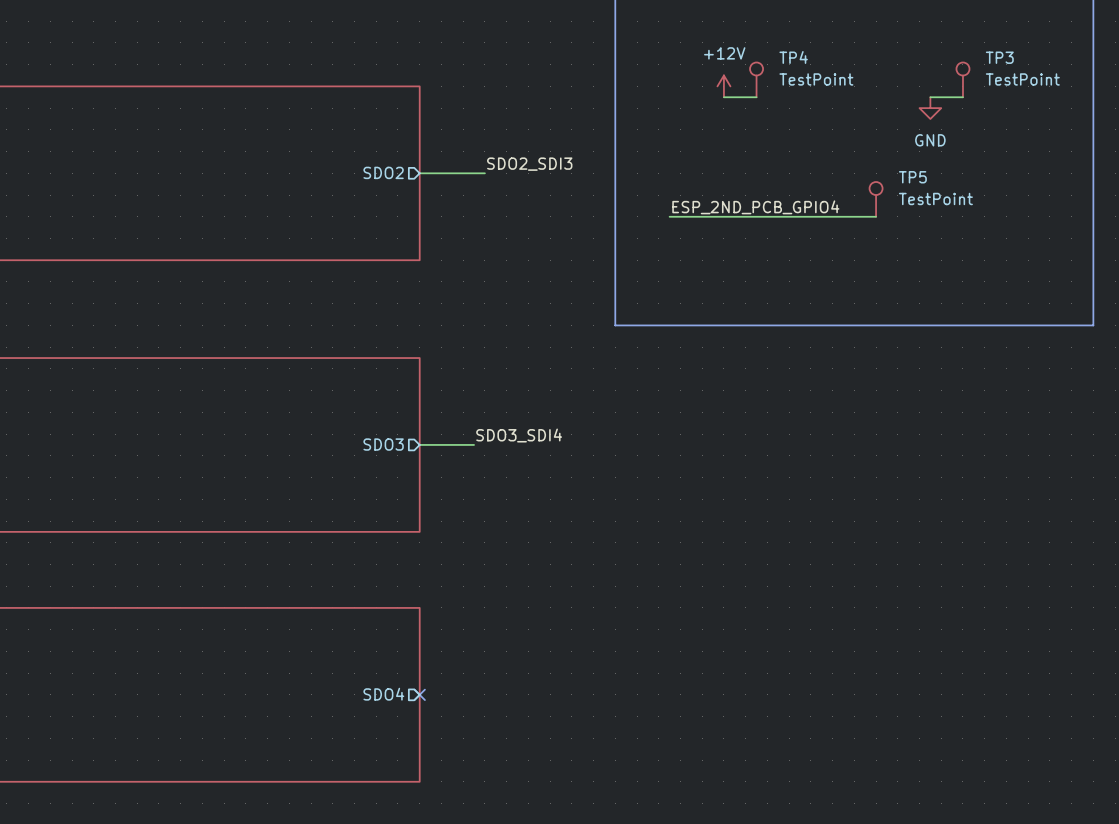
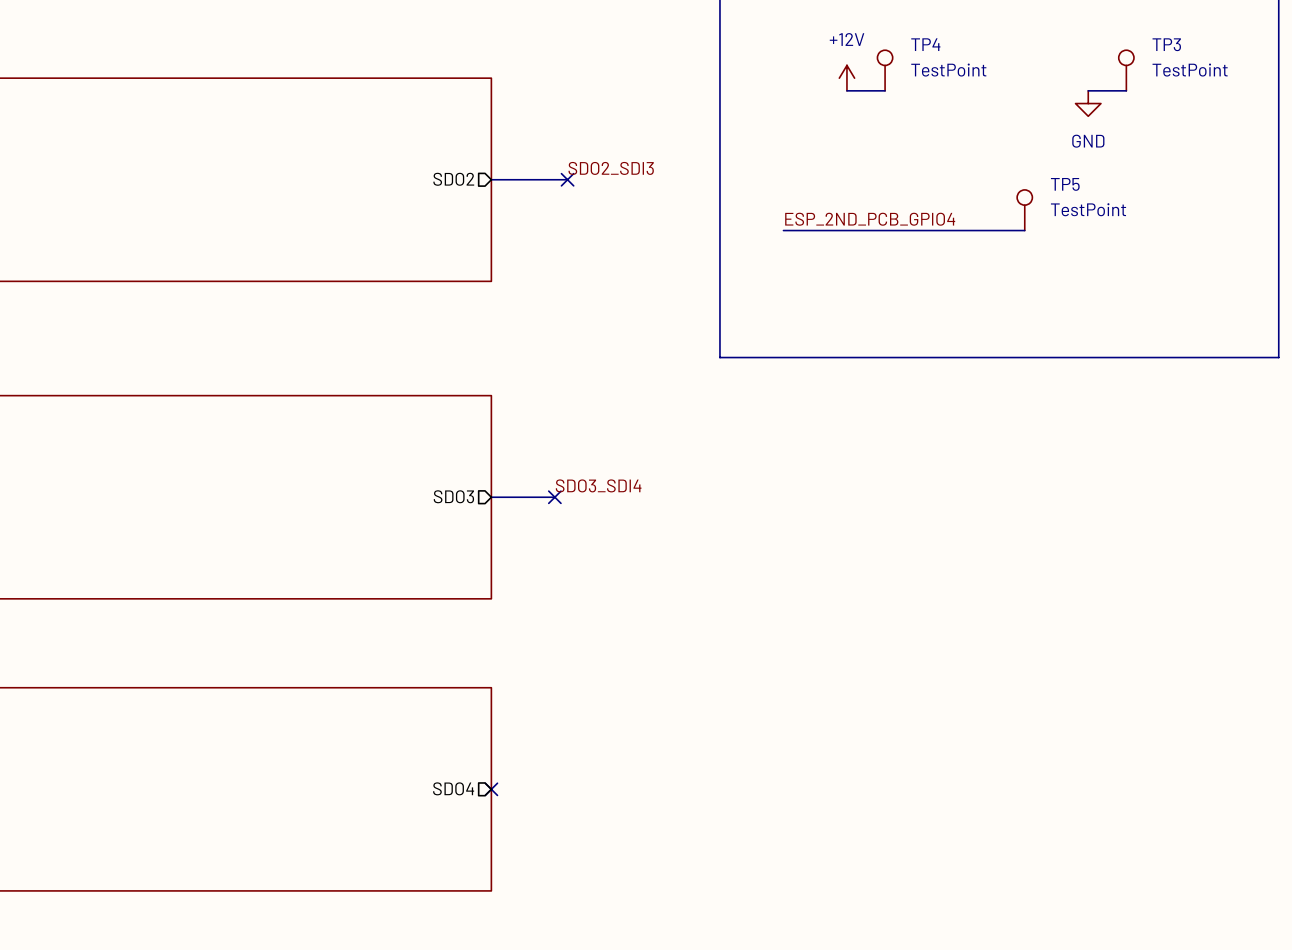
no-connect mark: none -> (567, 179)
no-connect mark: none -> (554, 497)

